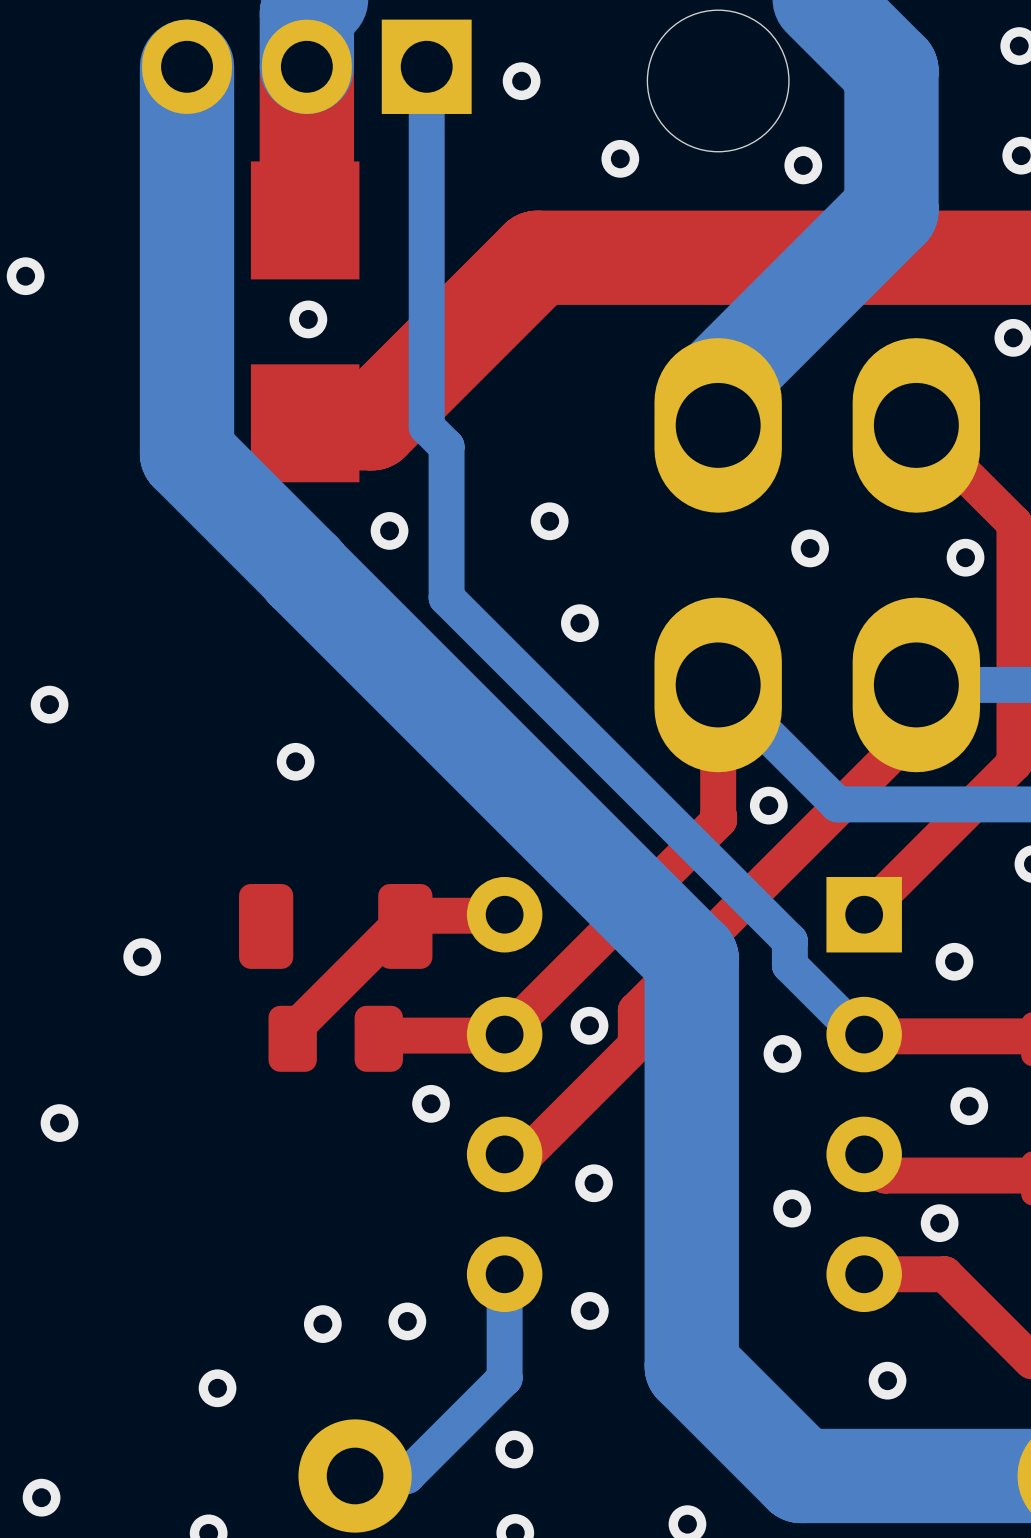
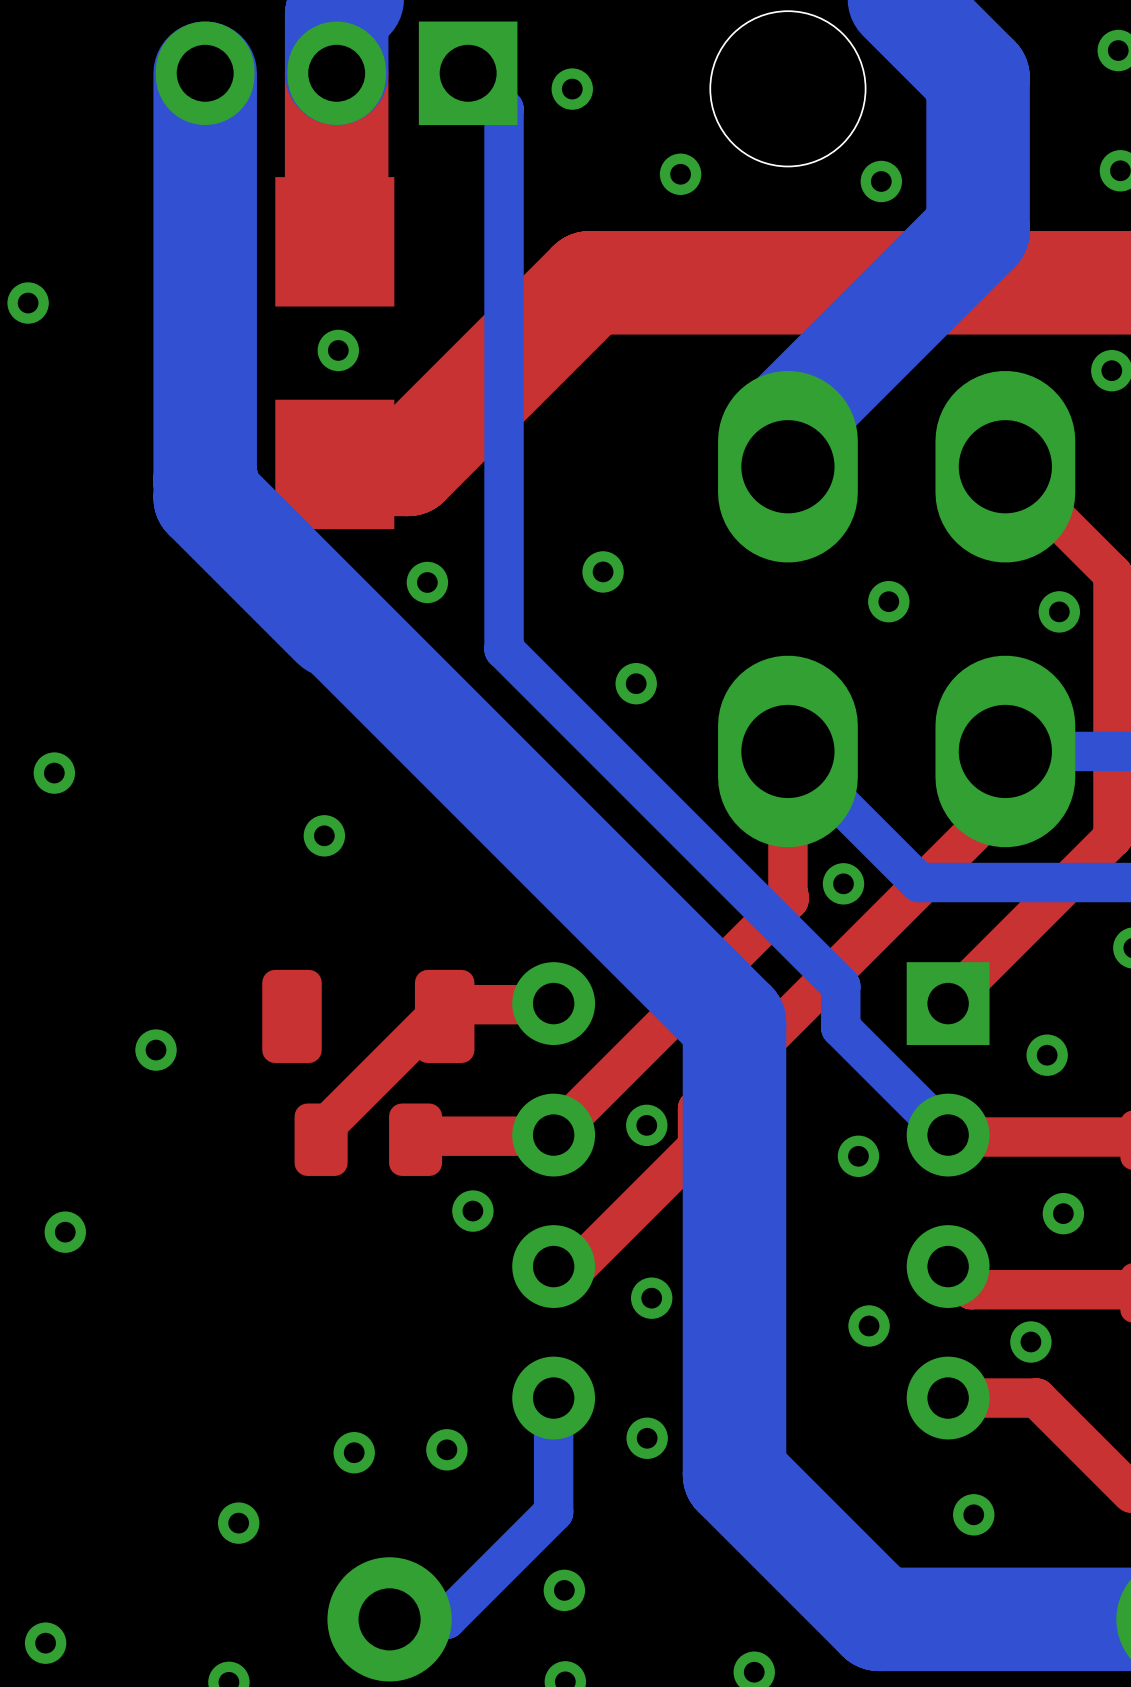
bottom track: (426, 66) (426, 426) (446, 446) (446, 597) (789, 940) (789, 965) (859, 1034) (864, 1034) -> (468, 73) (504, 109) (504, 649) (840, 986) (840, 1027) (948, 1135)
bottom track: (303, 571) (691, 959) (691, 1366) -> (205, 480) (206, 482) (206, 495) (734, 1022) (734, 1474) (758, 1499)

